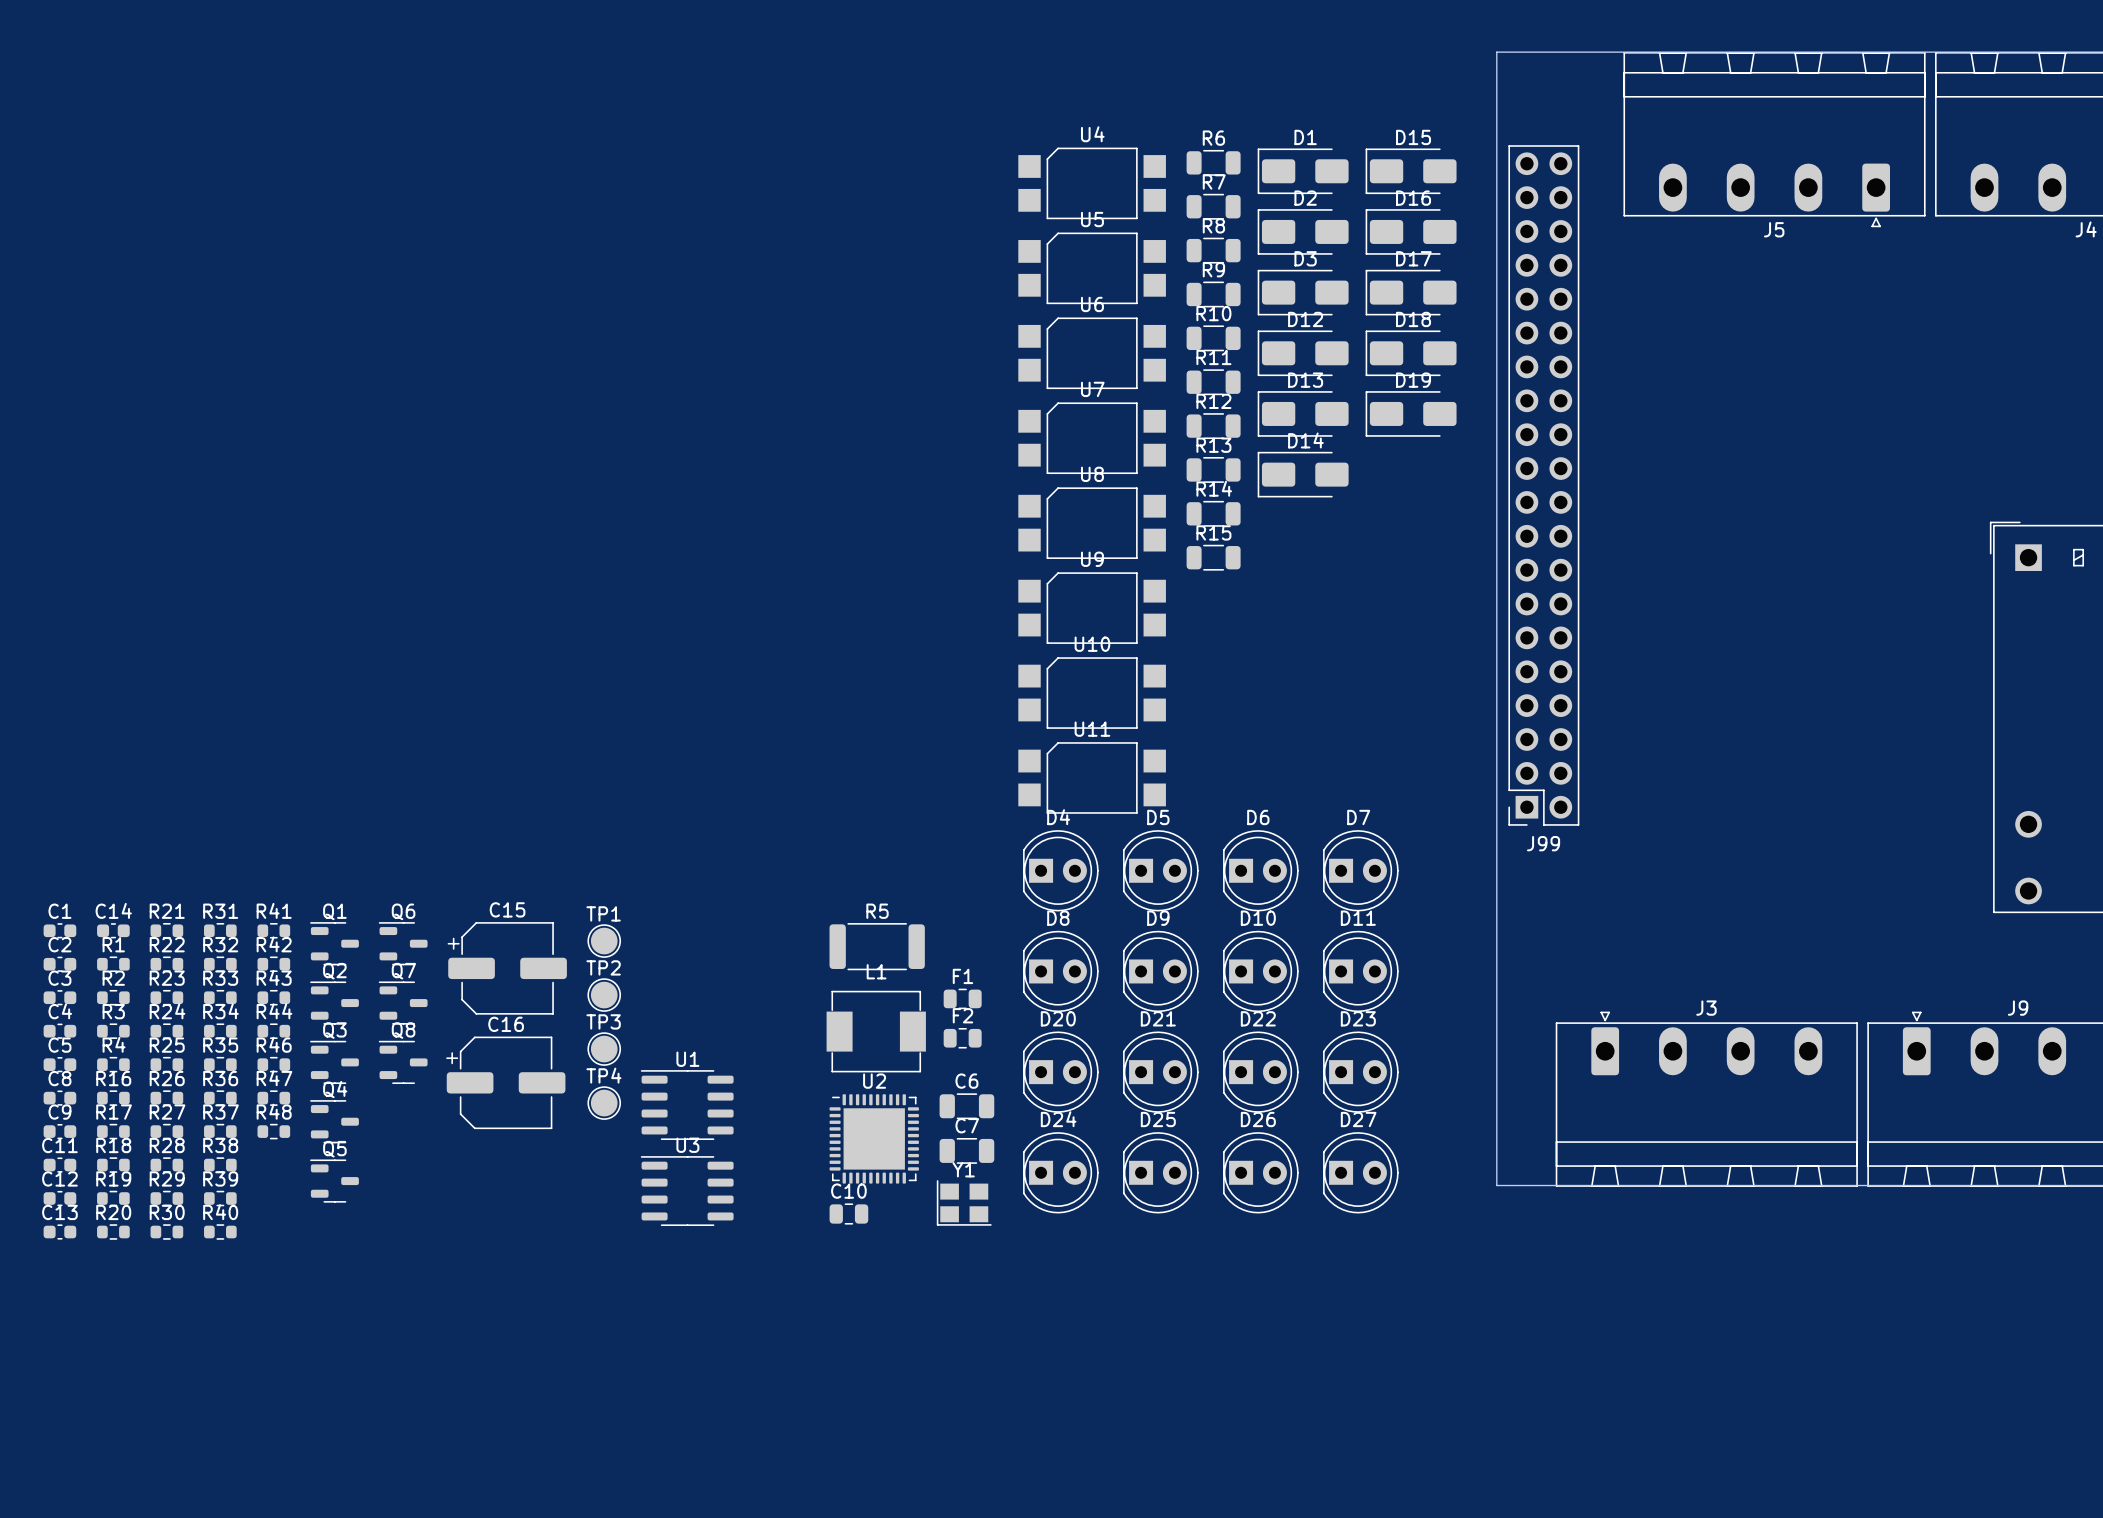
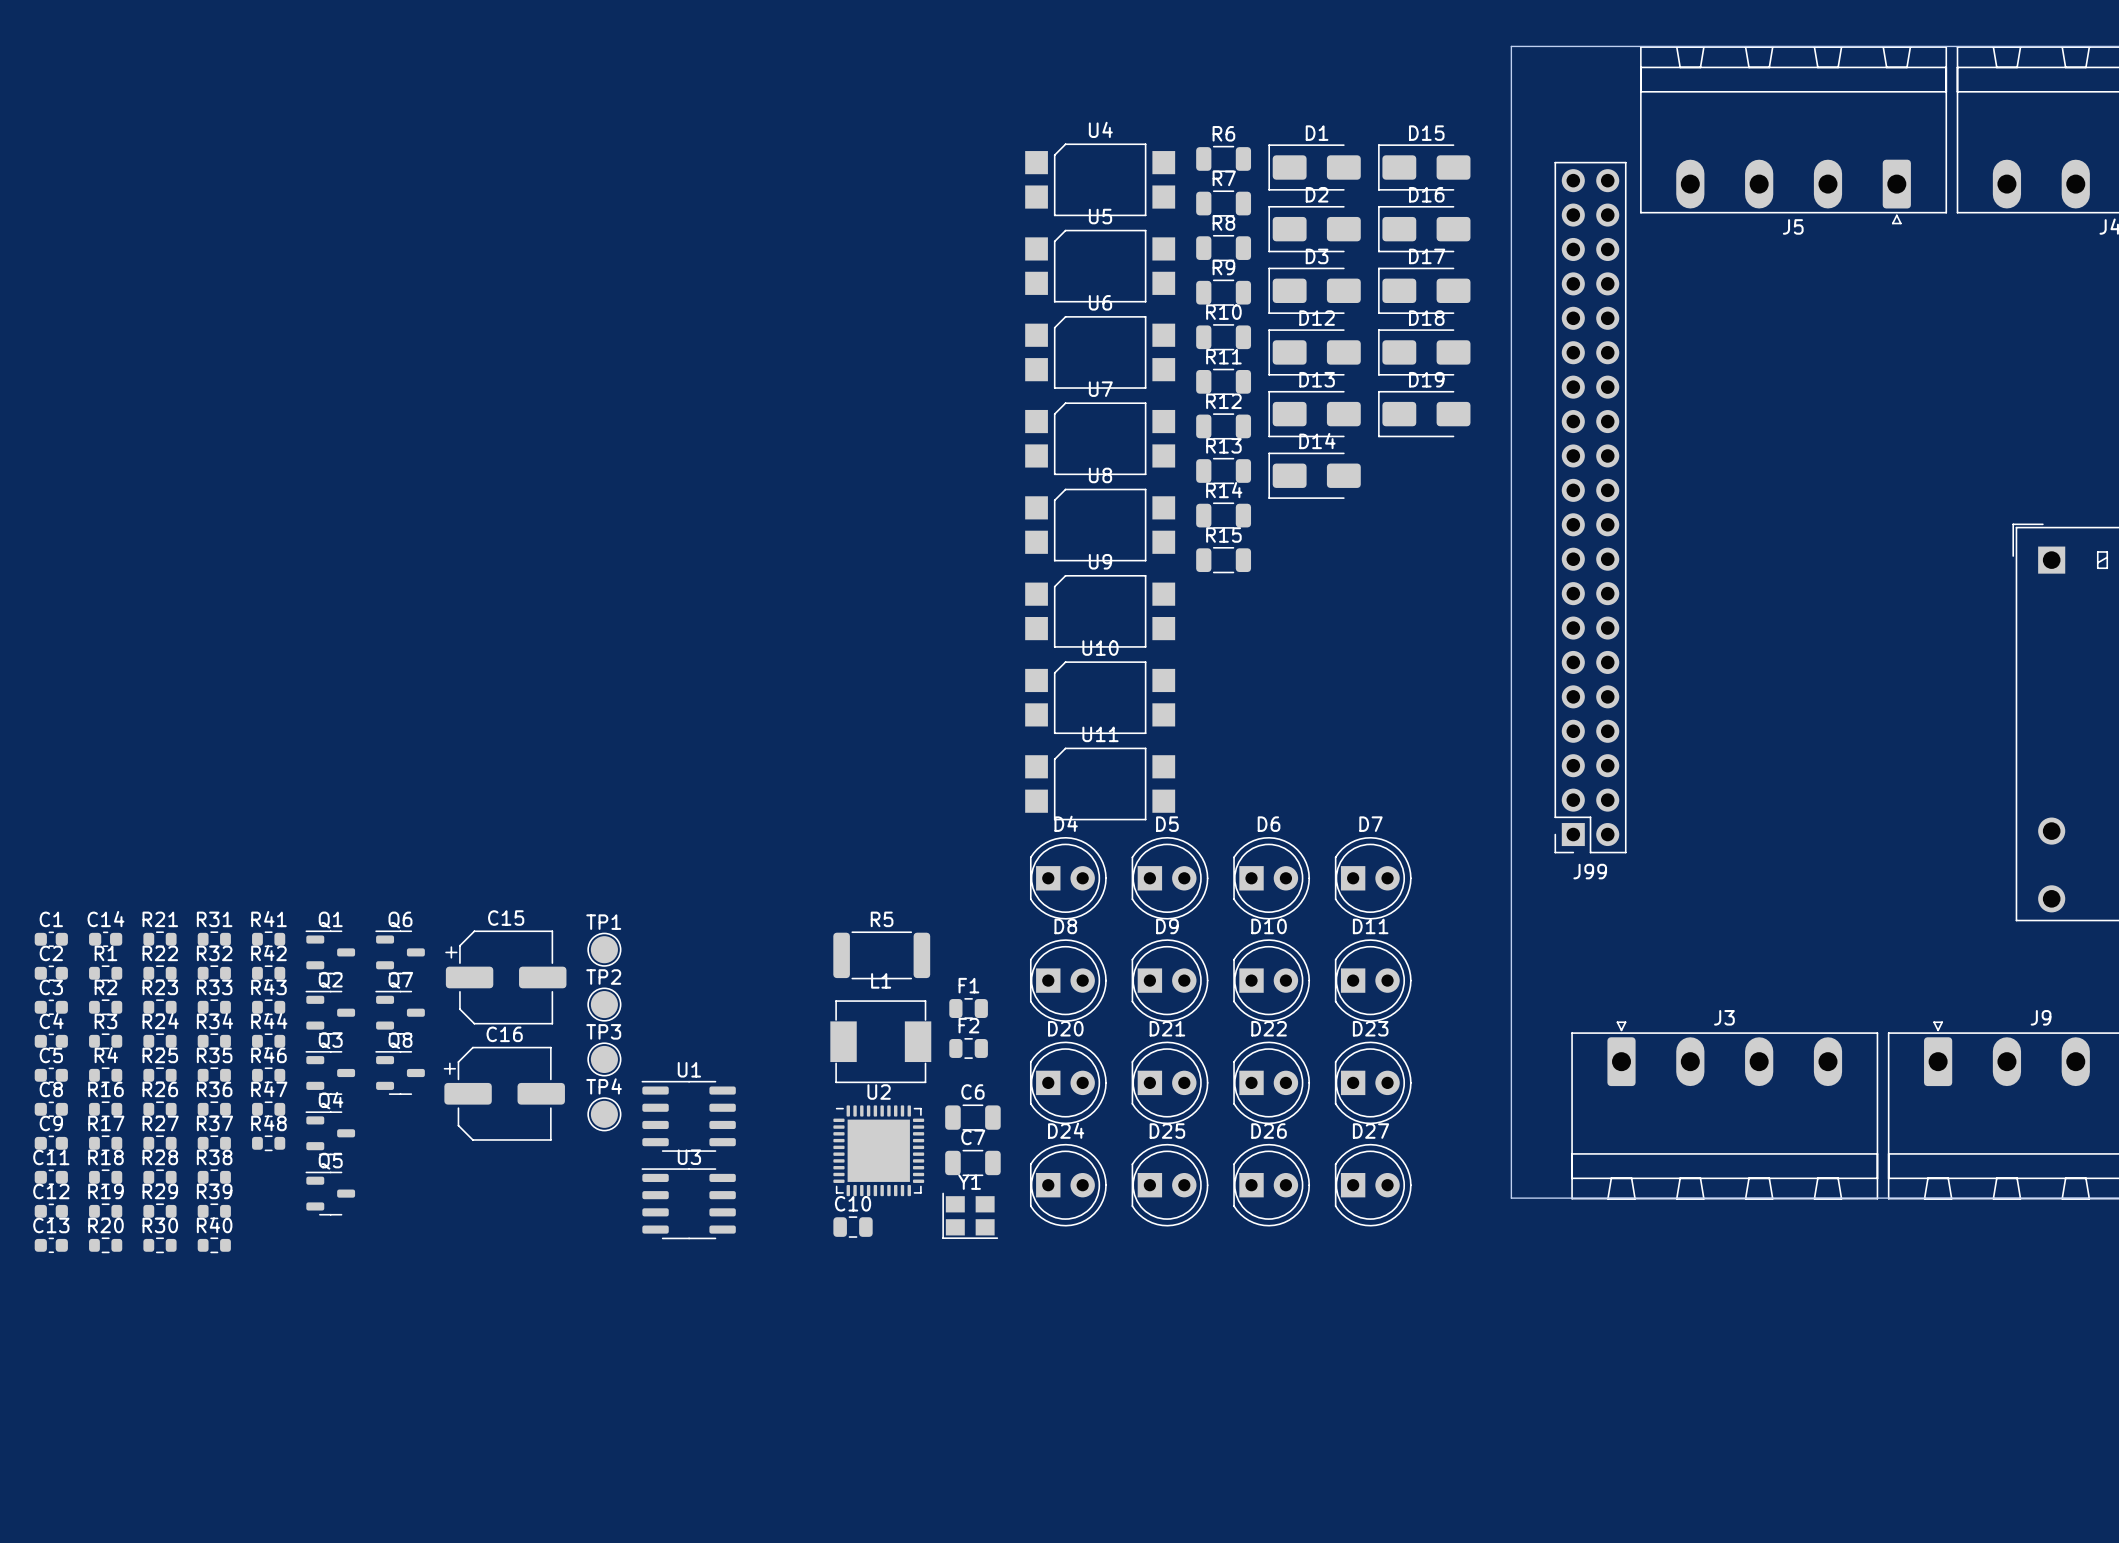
J99 position: (1543, 485) -> (1590, 507)

